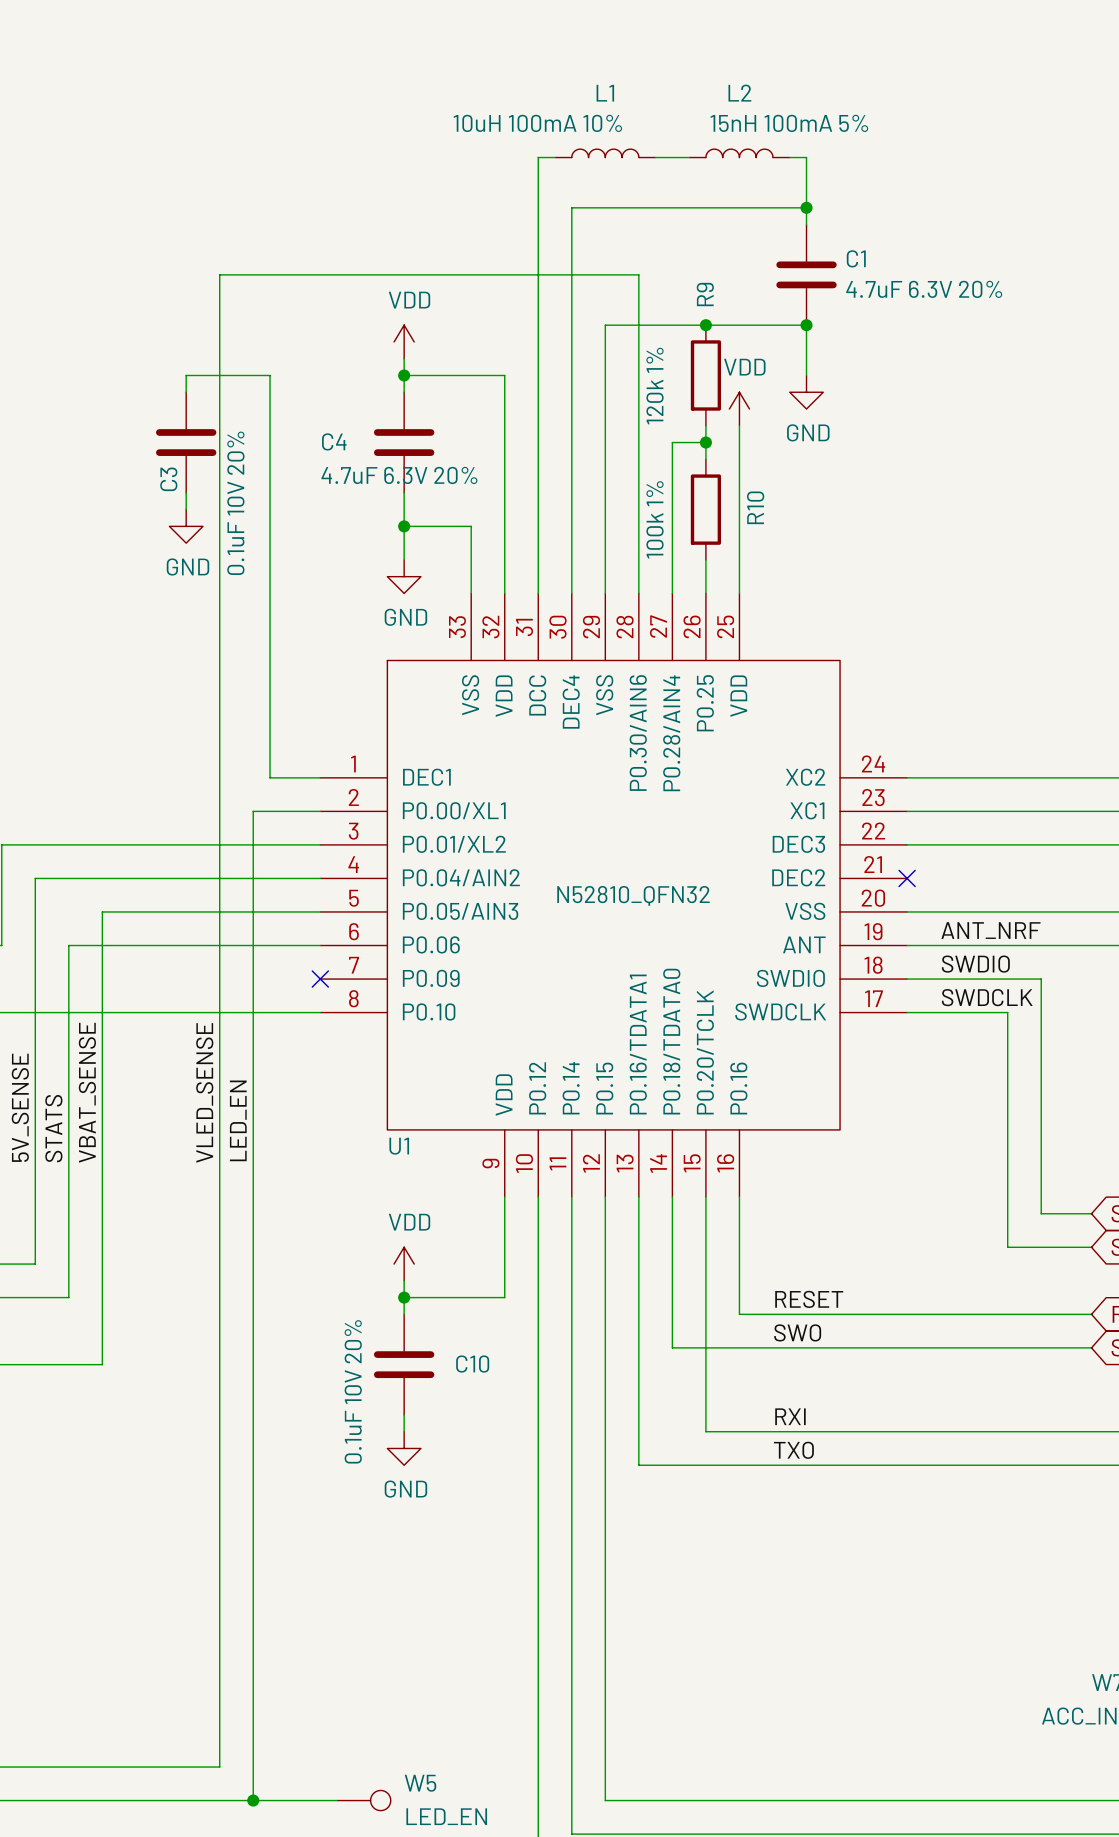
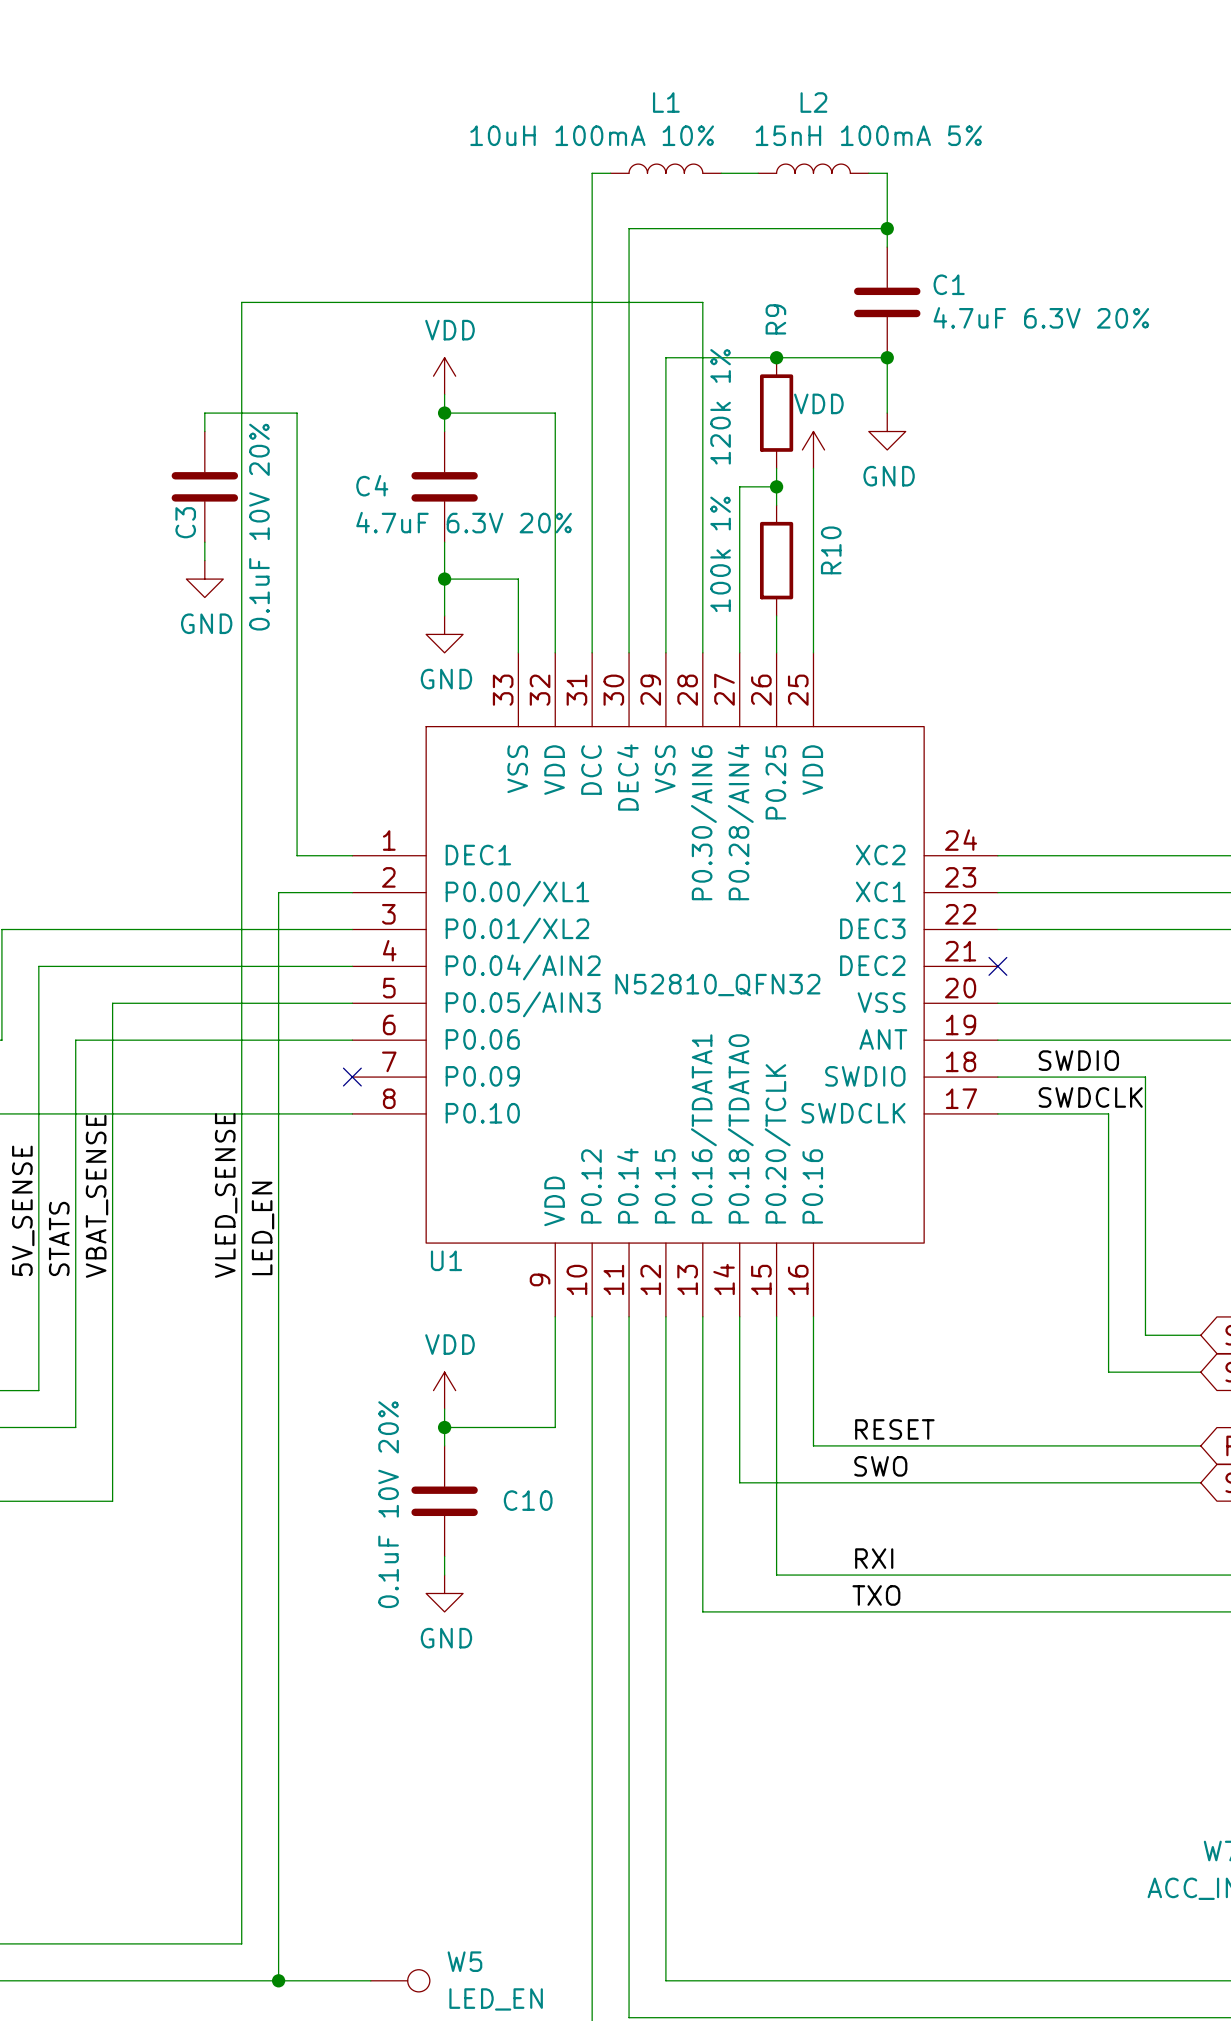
label: ANT_NRF (990, 930) -> none

